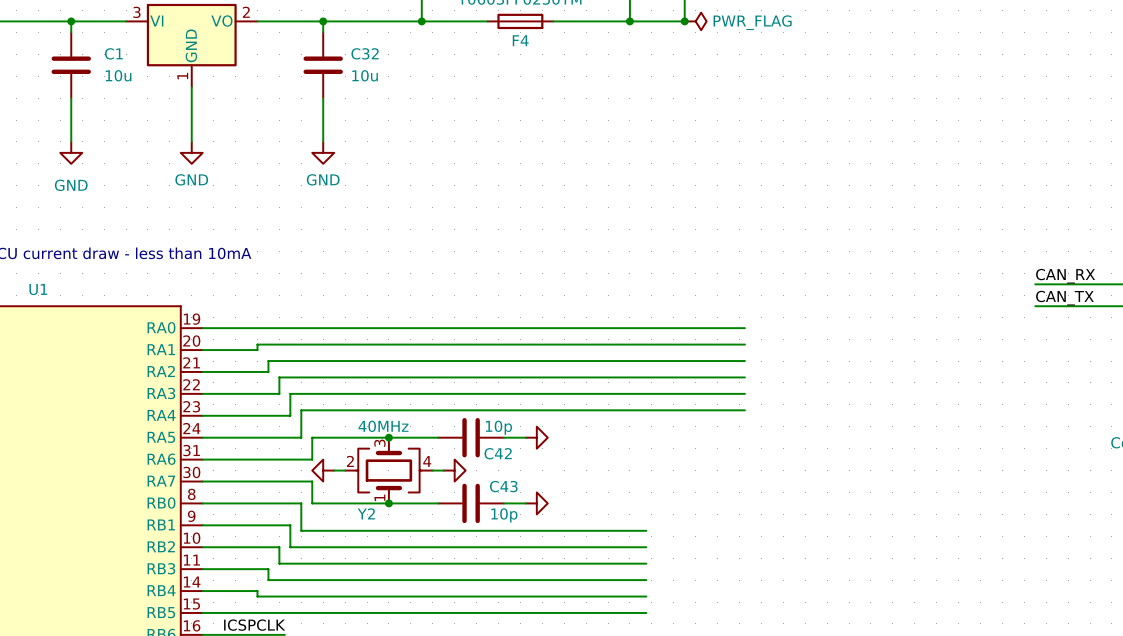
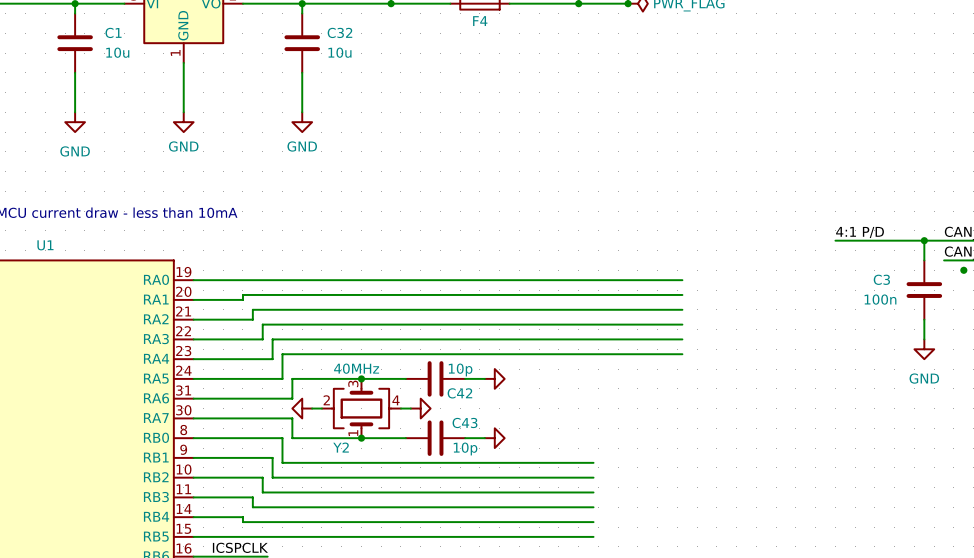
label: none -> 4:1 P/D (860, 232)
wire: none -> (835, 240) (944, 240)
wire: none -> (924, 240) (924, 260)
junction: none -> (924, 240)
junction: none -> (963, 270)
C3: none -> 100n (924, 290)
wire: none -> (924, 319) (924, 339)
power symbol: none -> GND (924, 349)

